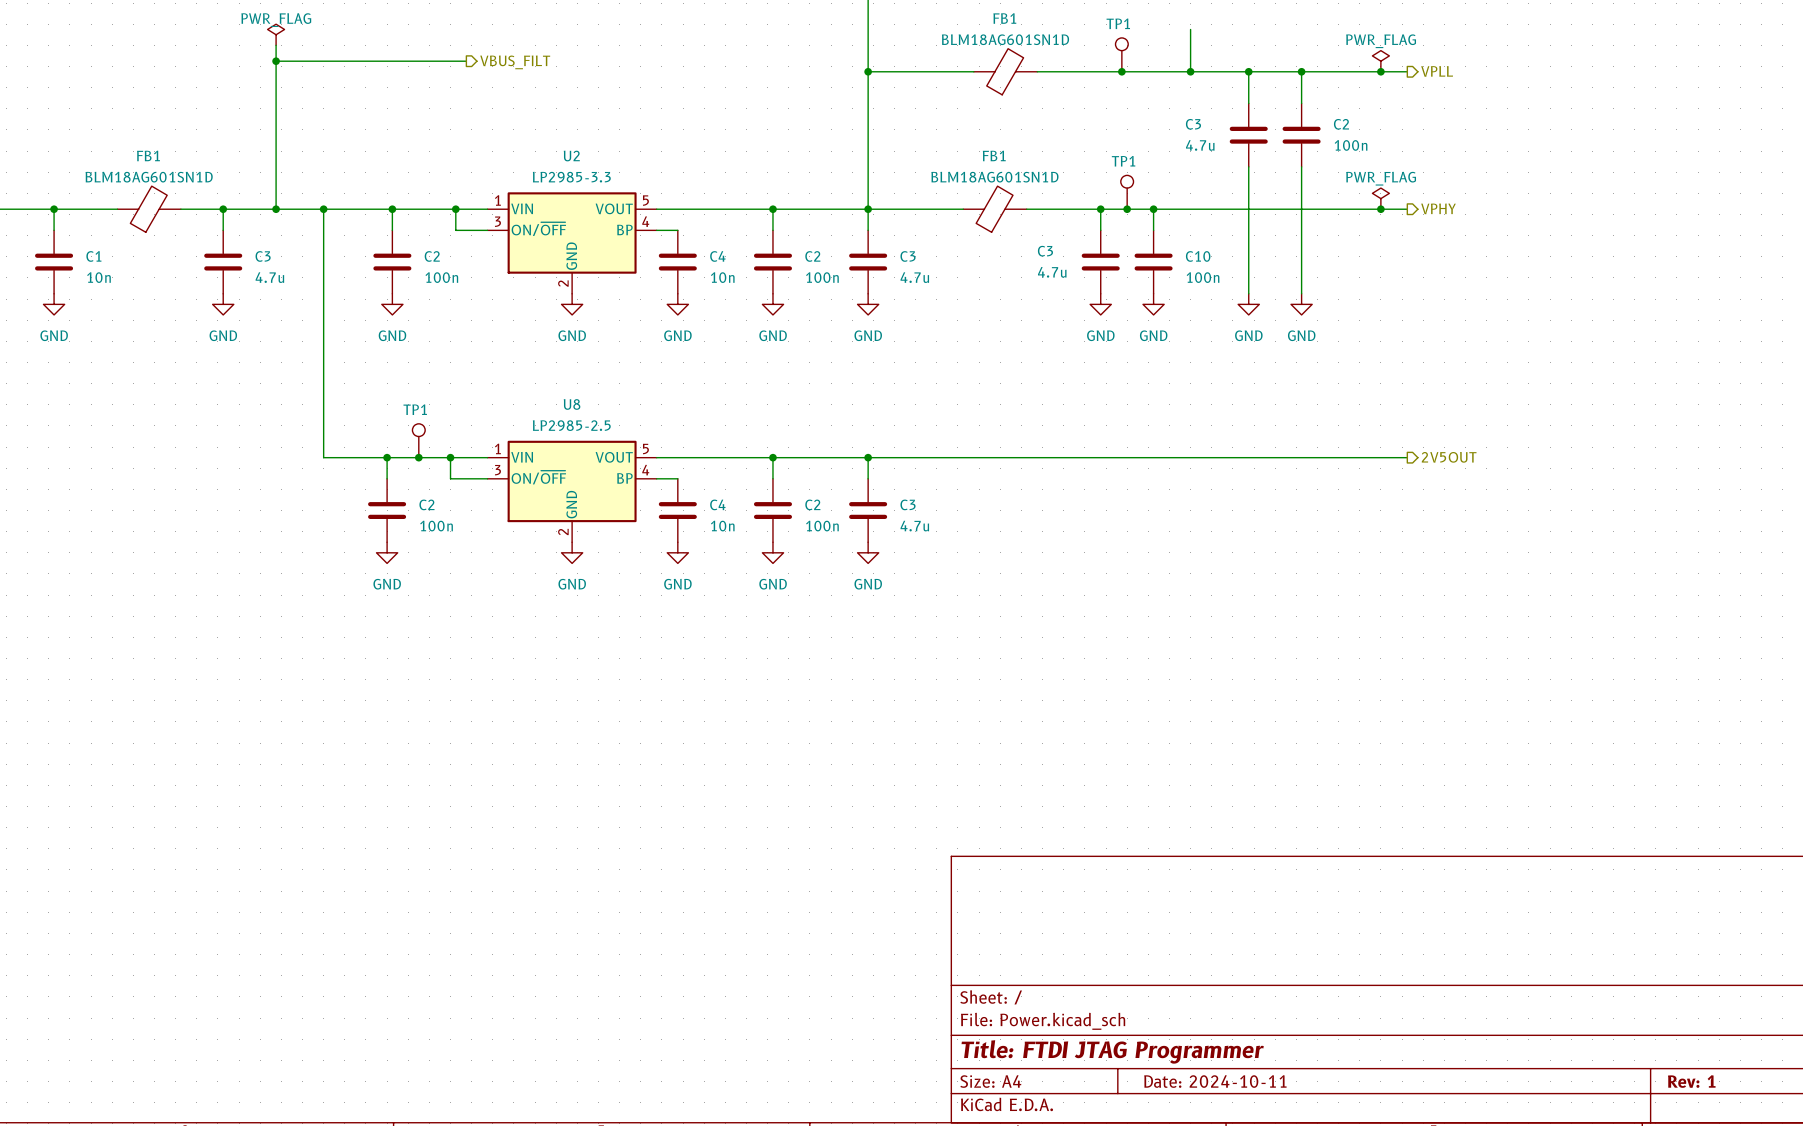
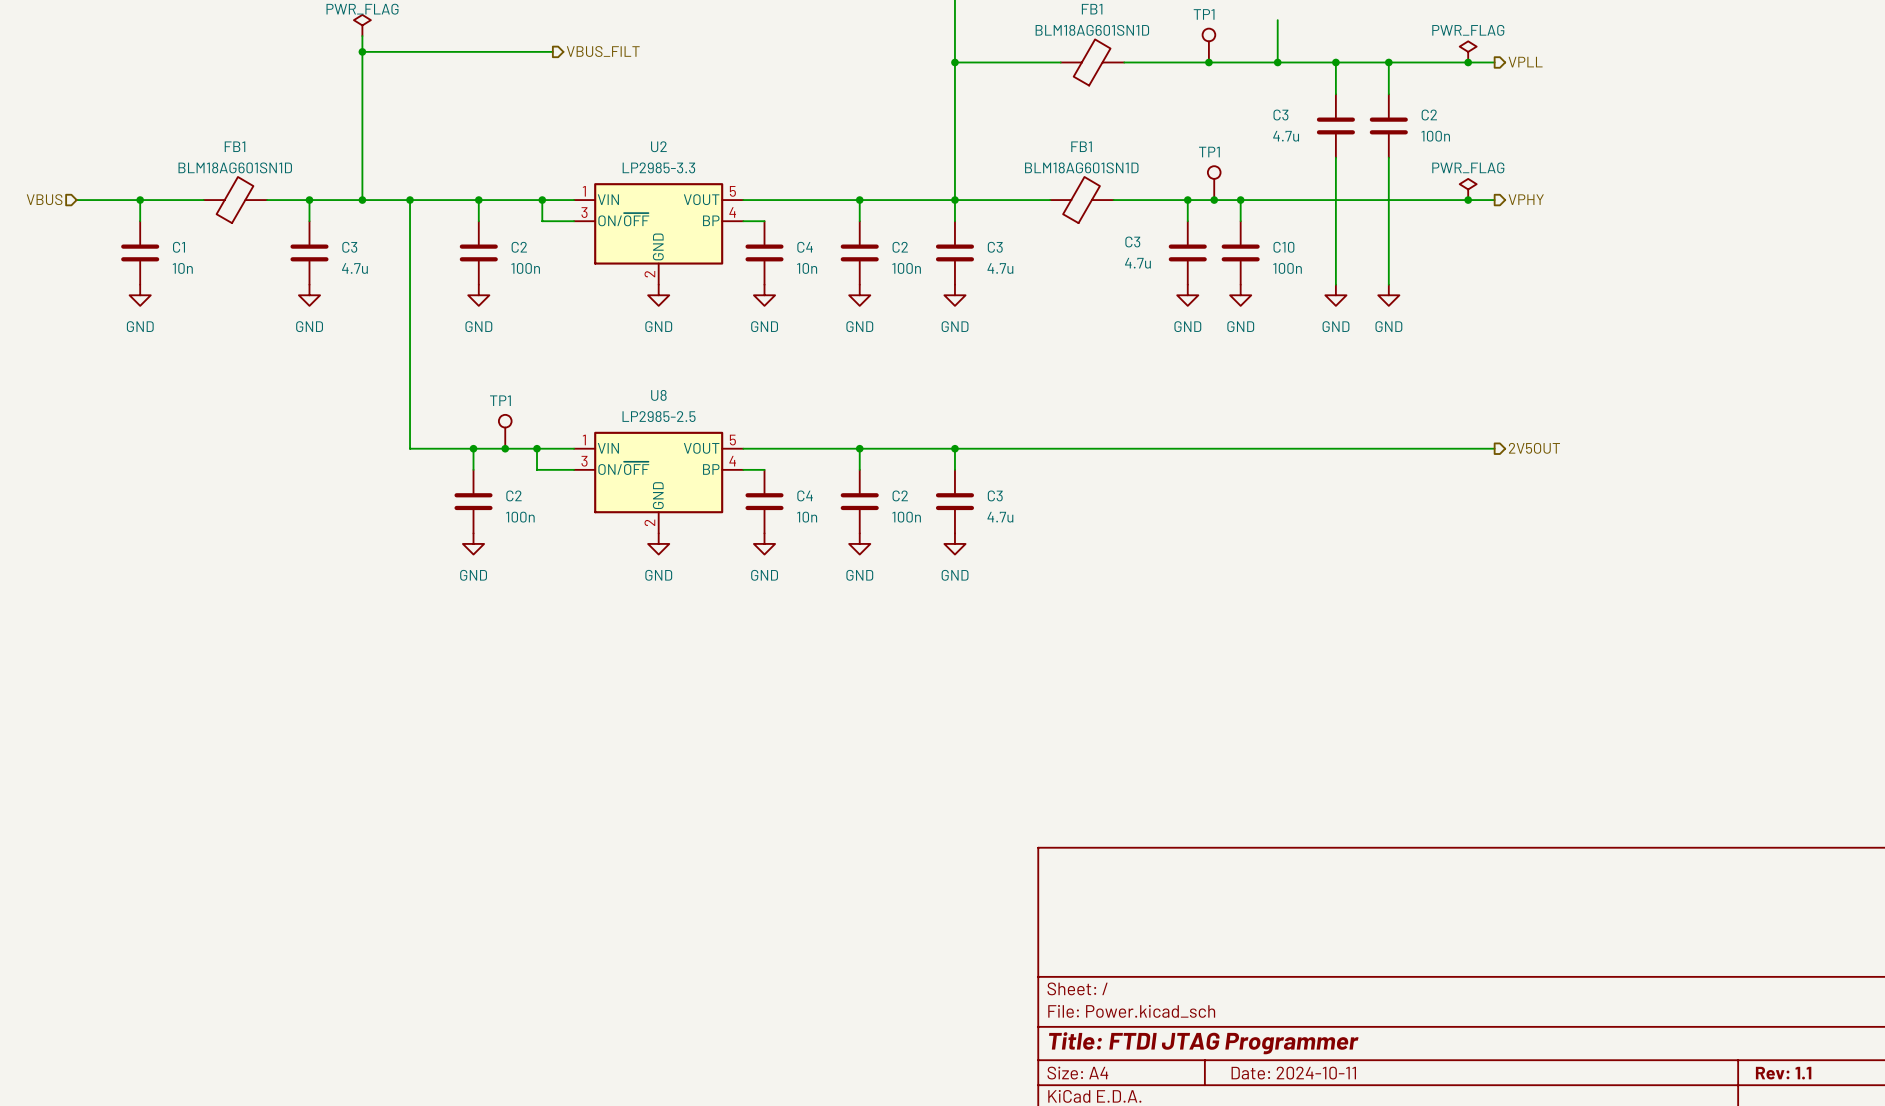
title block: Rev: 1 (1691, 1081) -> Rev: 1.1 (1783, 1073)

